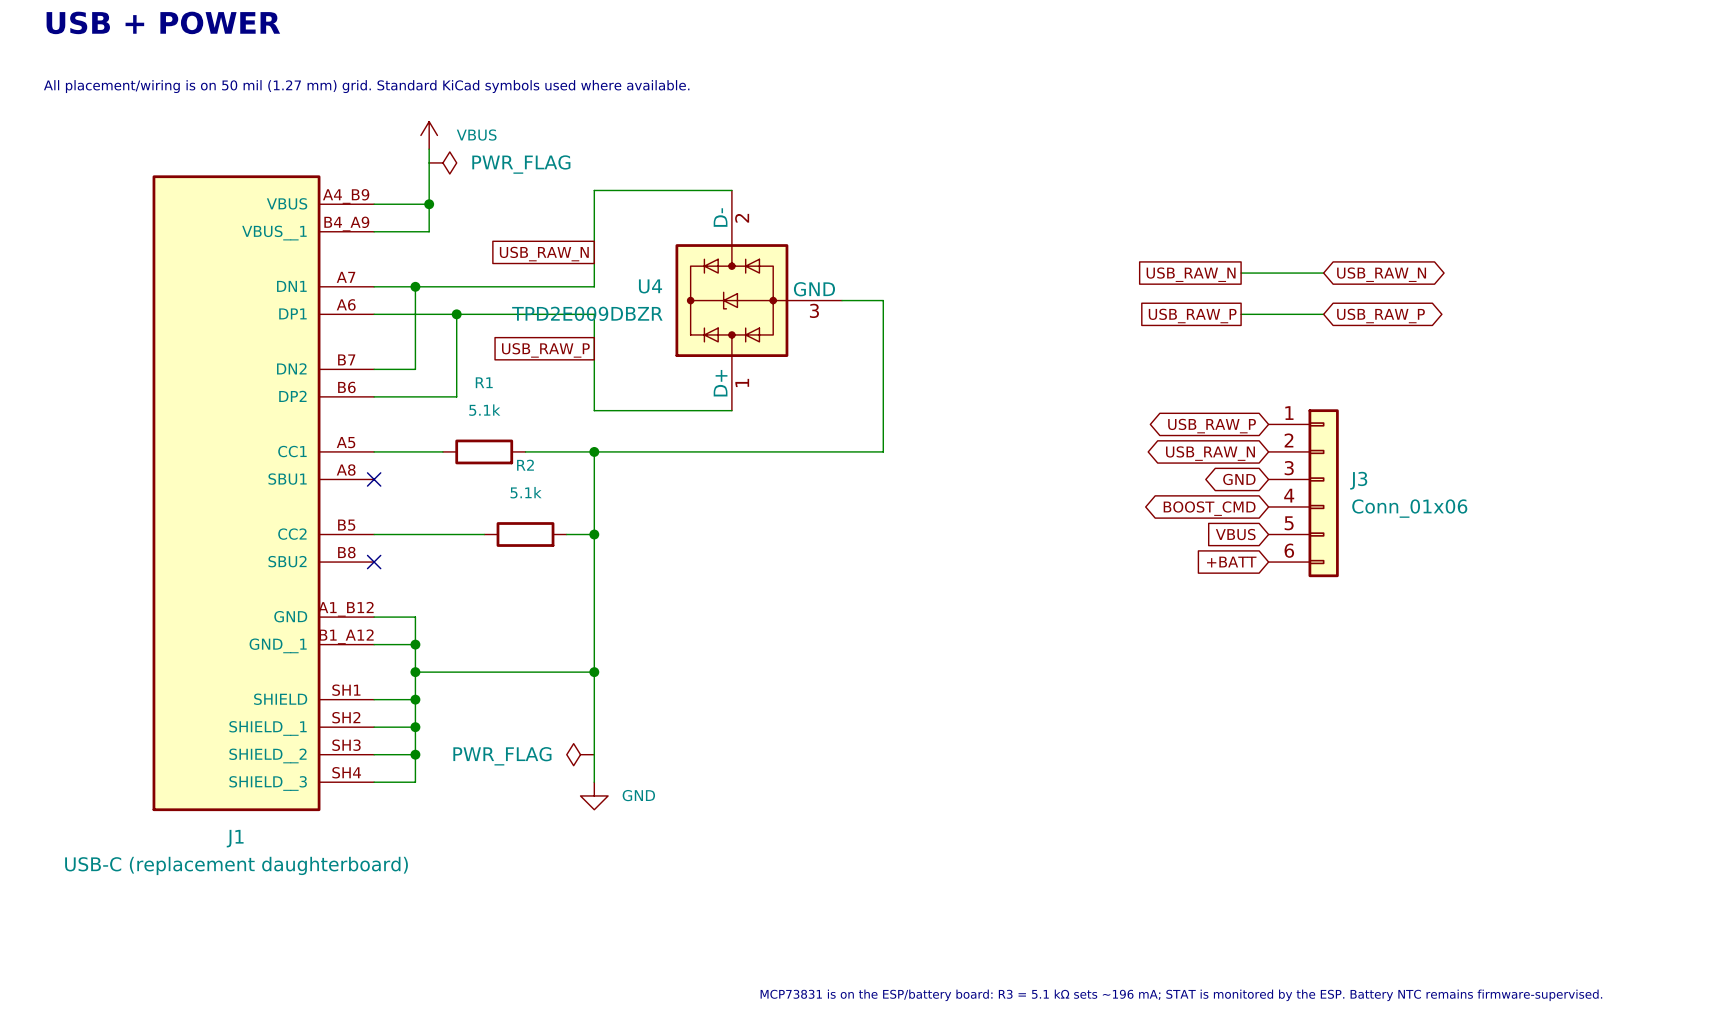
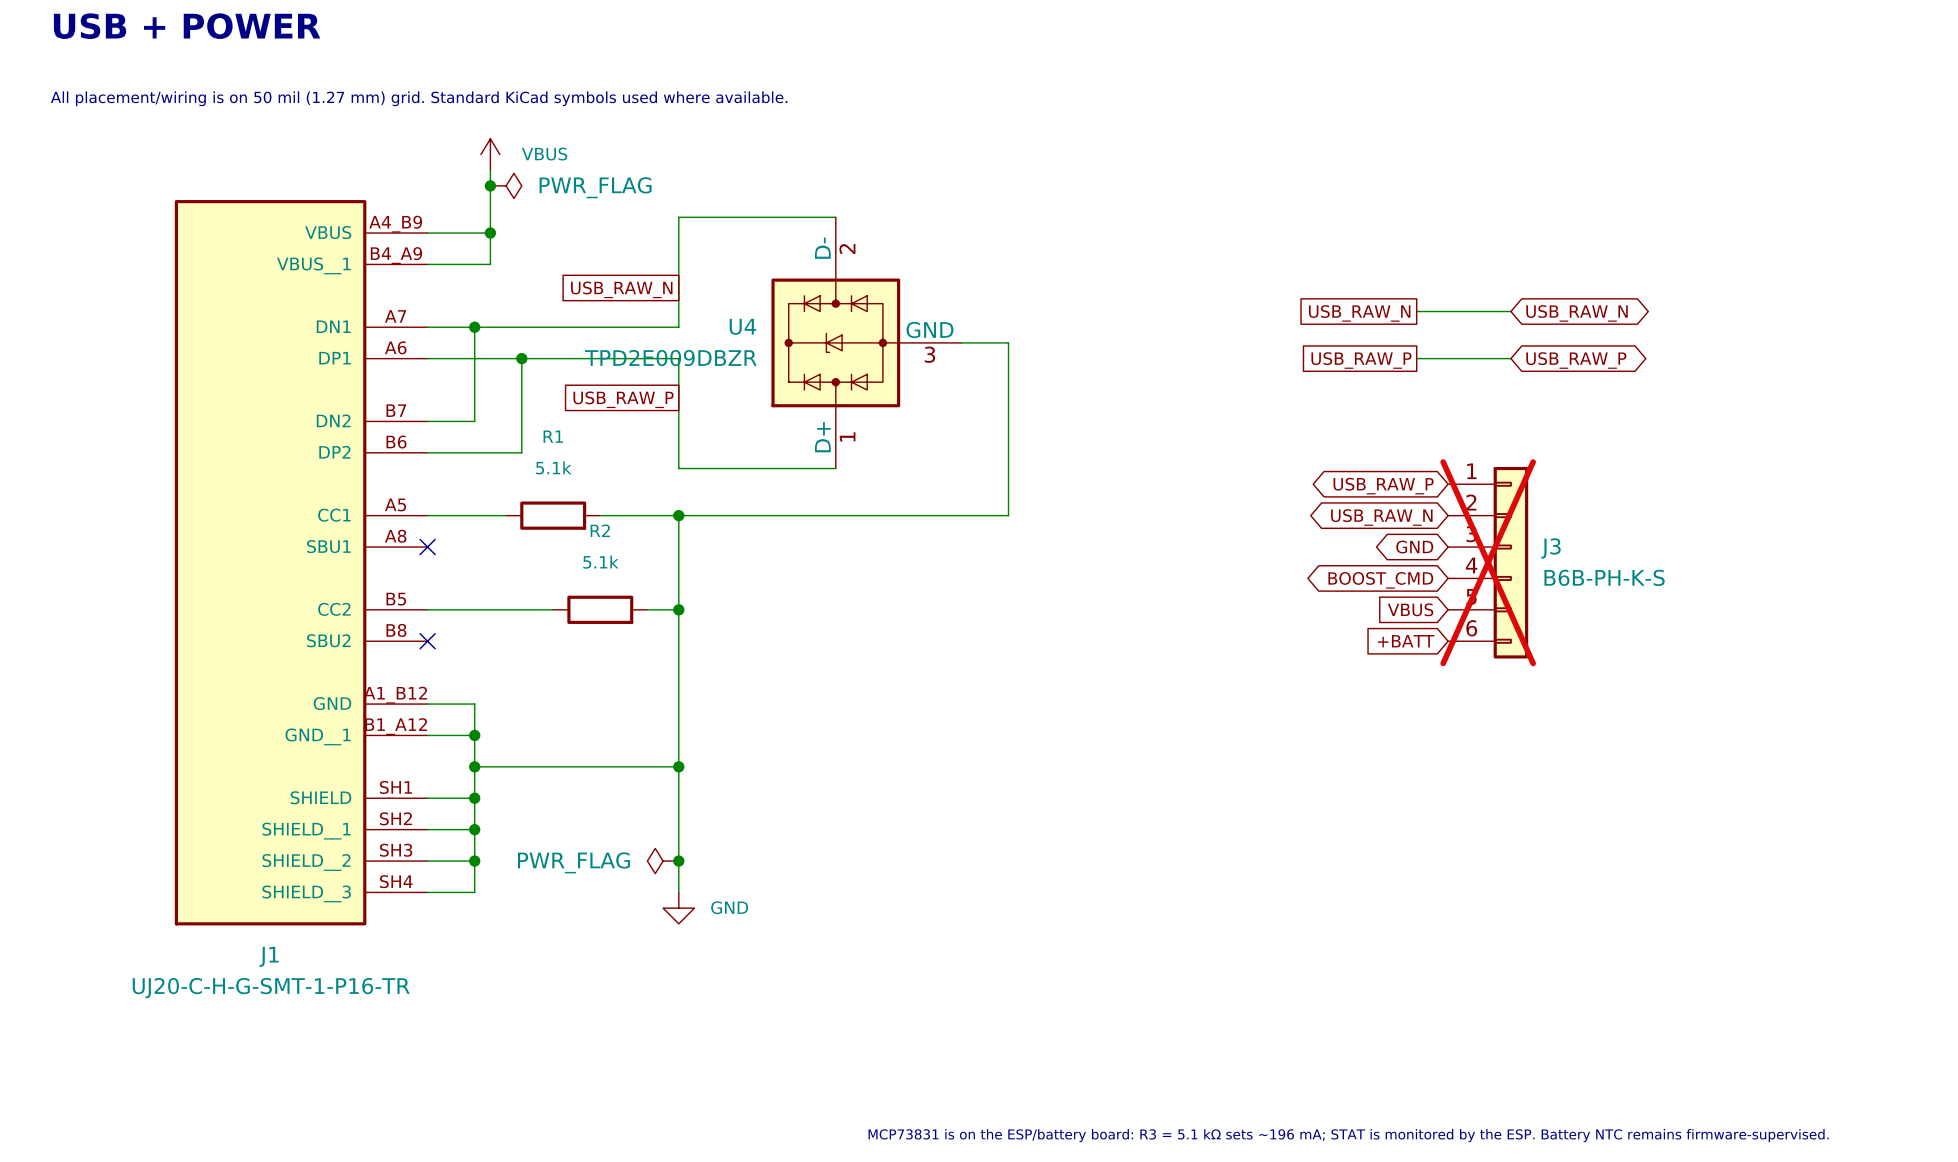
junction: none -> (490, 185)
J3 do-not-place cross: none -> (1488, 562)
J3 value: Conn_01x06 (1409, 508) -> B6B-PH-K-S (1604, 577)
junction: none -> (678, 861)
J1 value: USB-C (replacement daughterboard) (236, 865) -> UJ20-C-H-G-SMT-1-P16-TR (271, 988)

